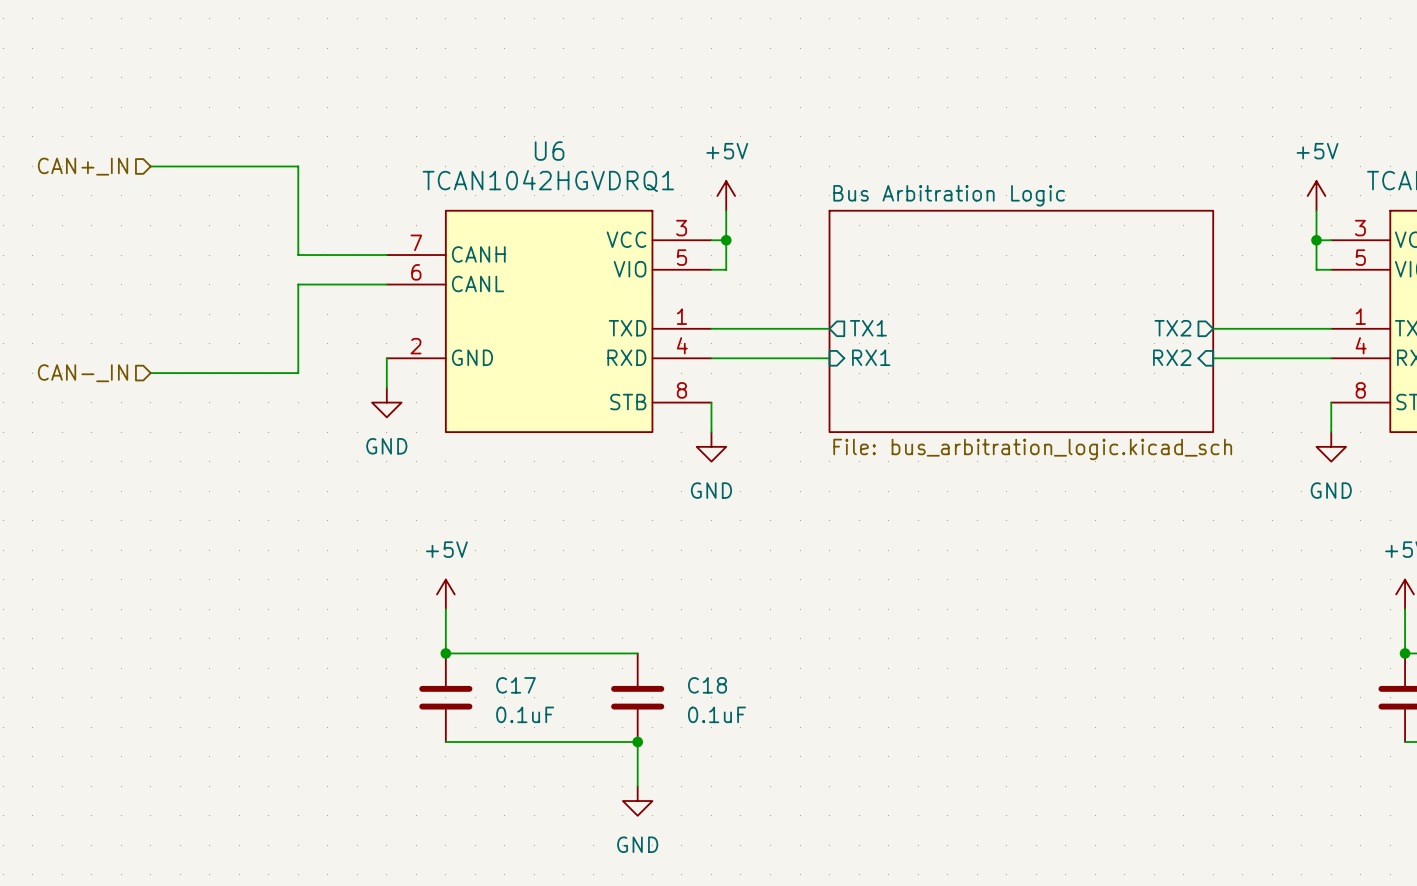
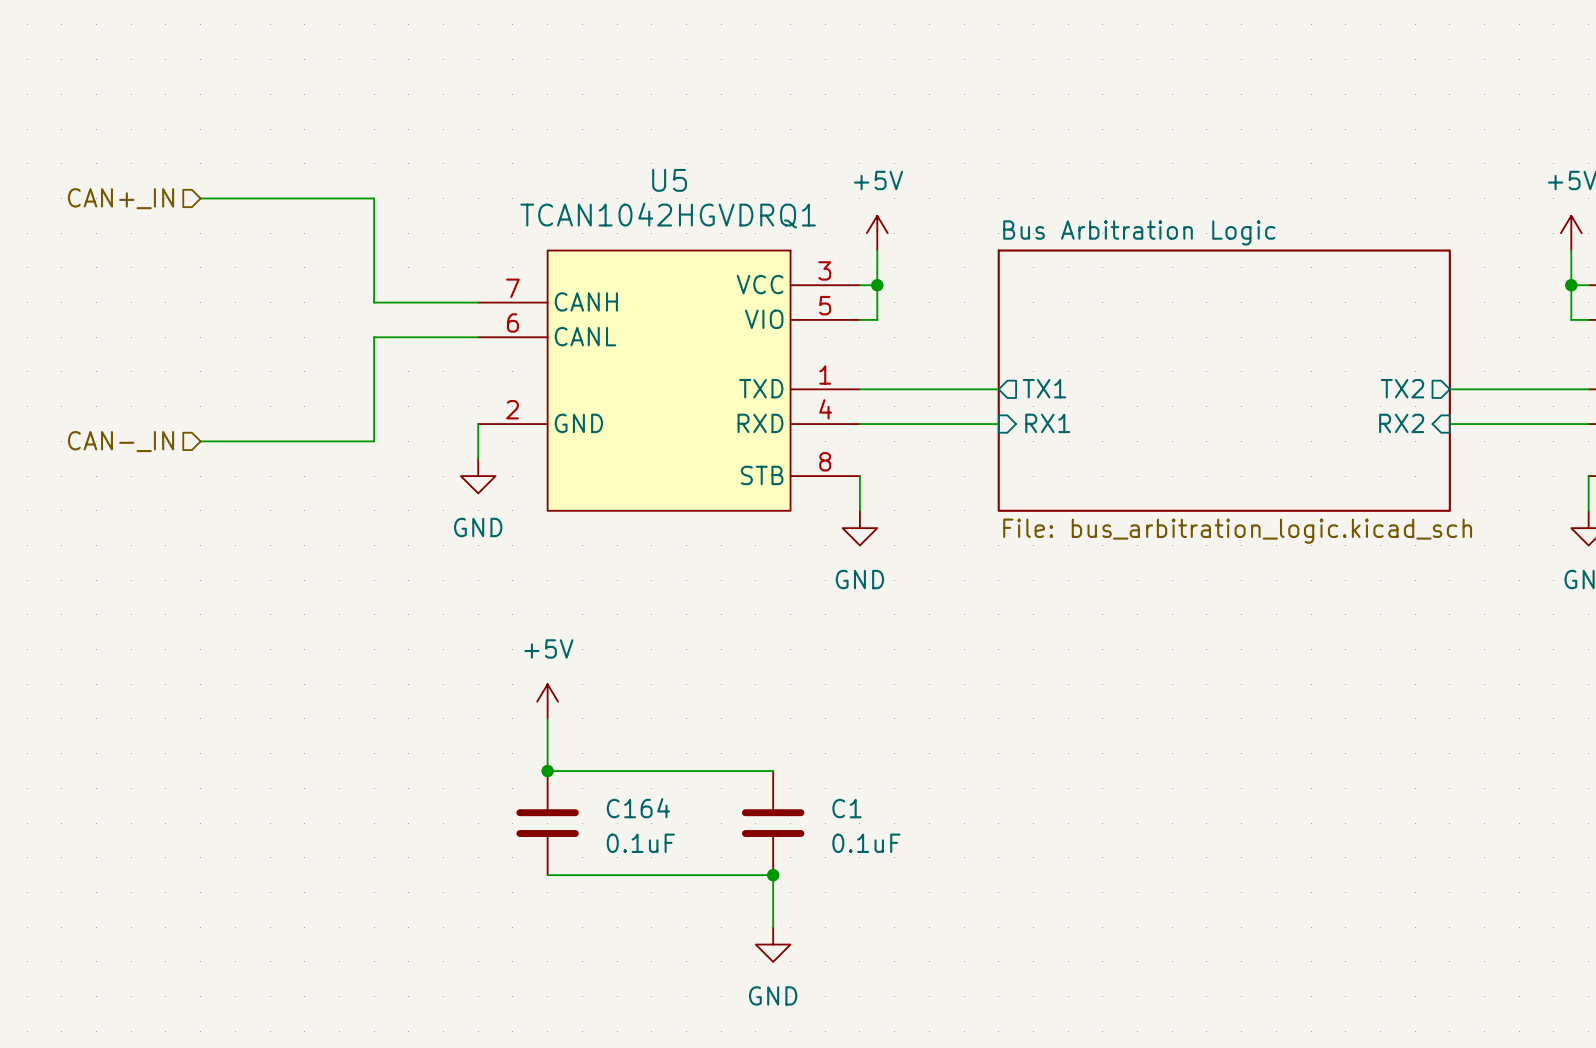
U6 name: U6 (549, 151) -> U5 (669, 180)
C17 name: C17 (516, 685) -> C164 (638, 808)
C18 name: C18 (707, 685) -> C1 (847, 808)

